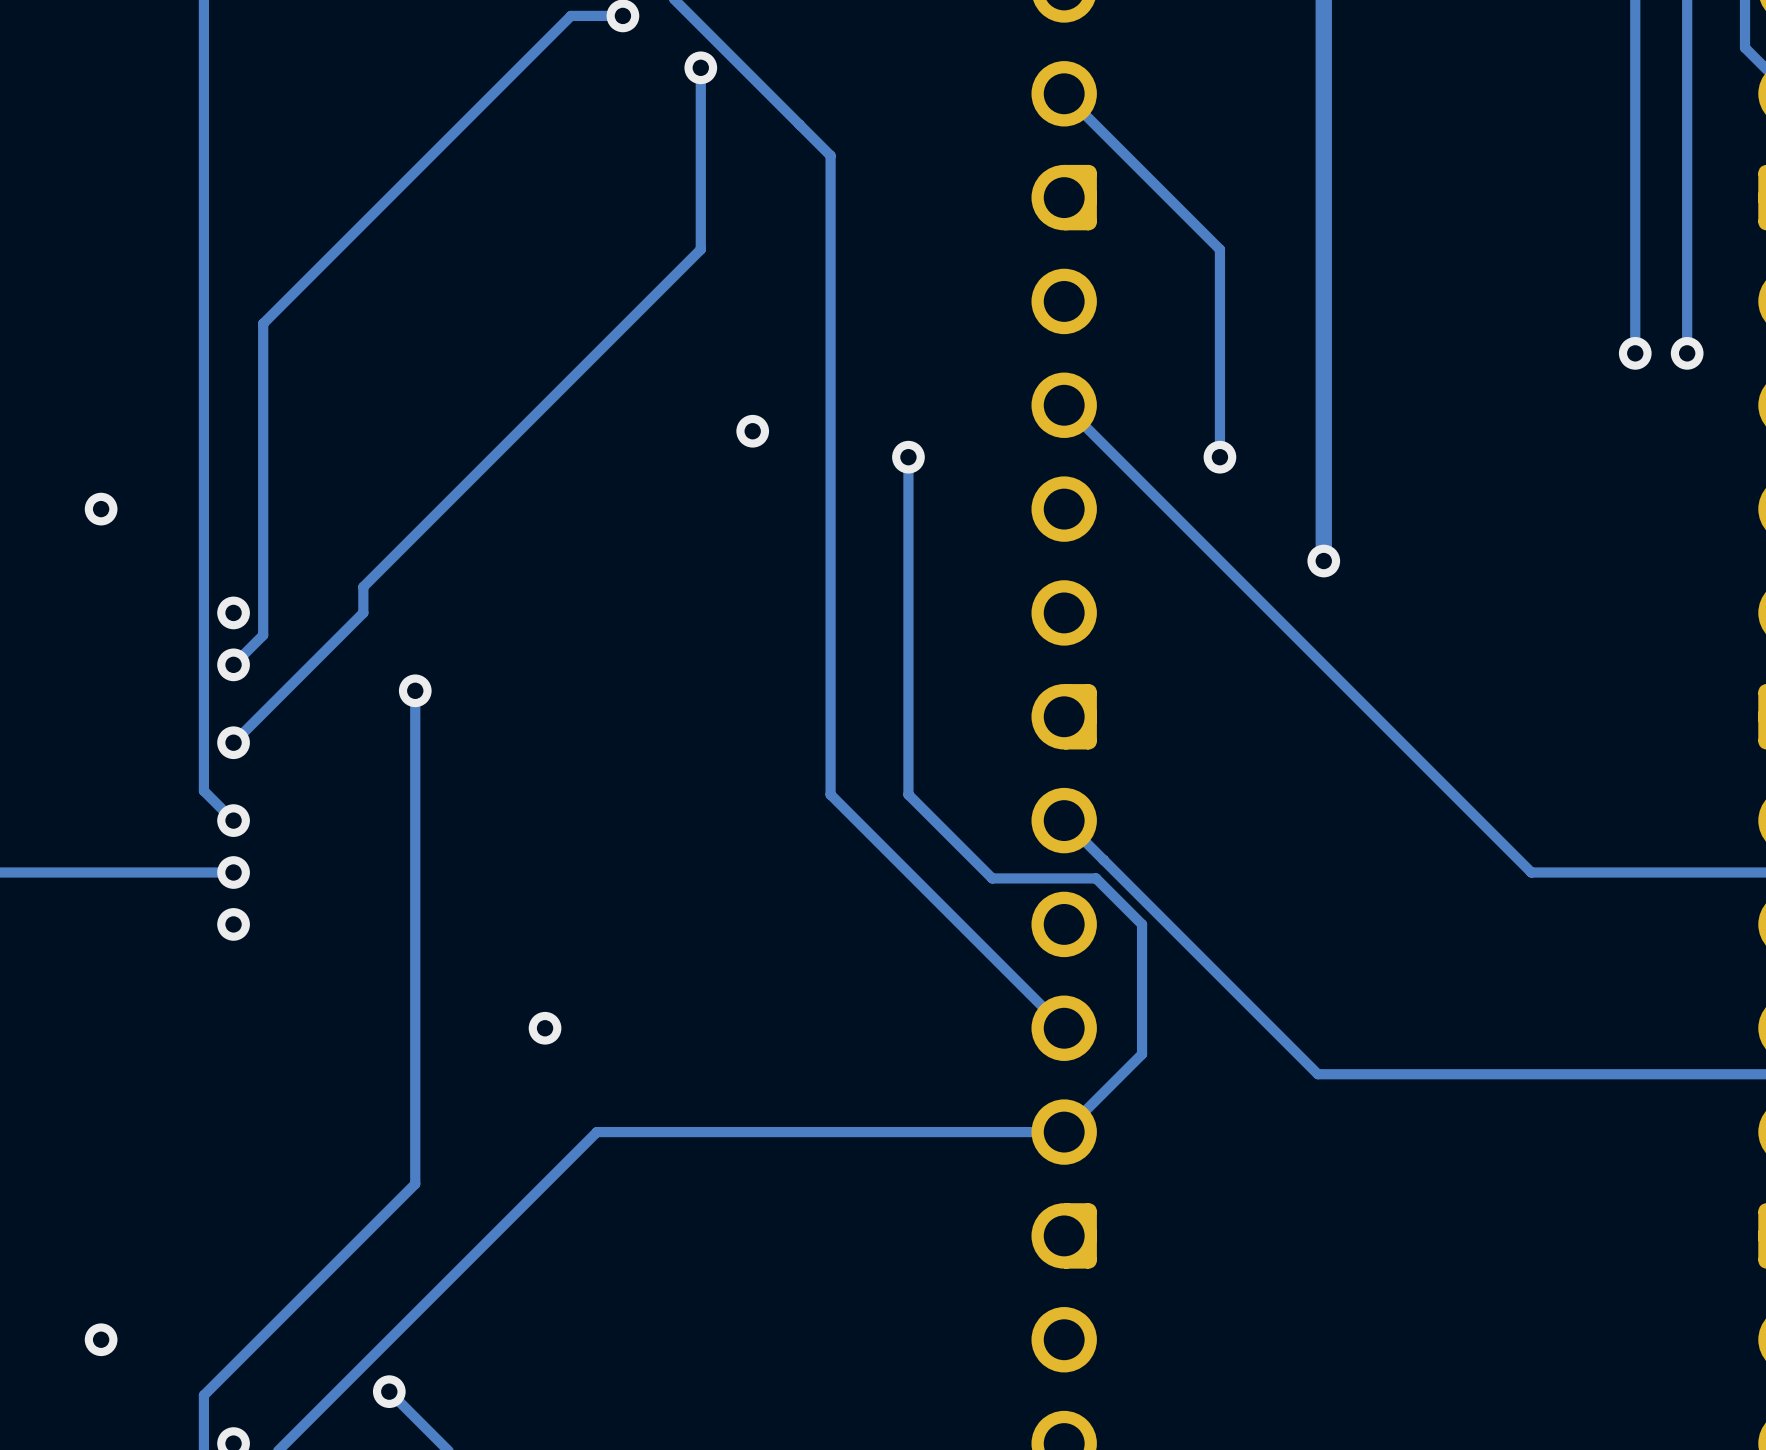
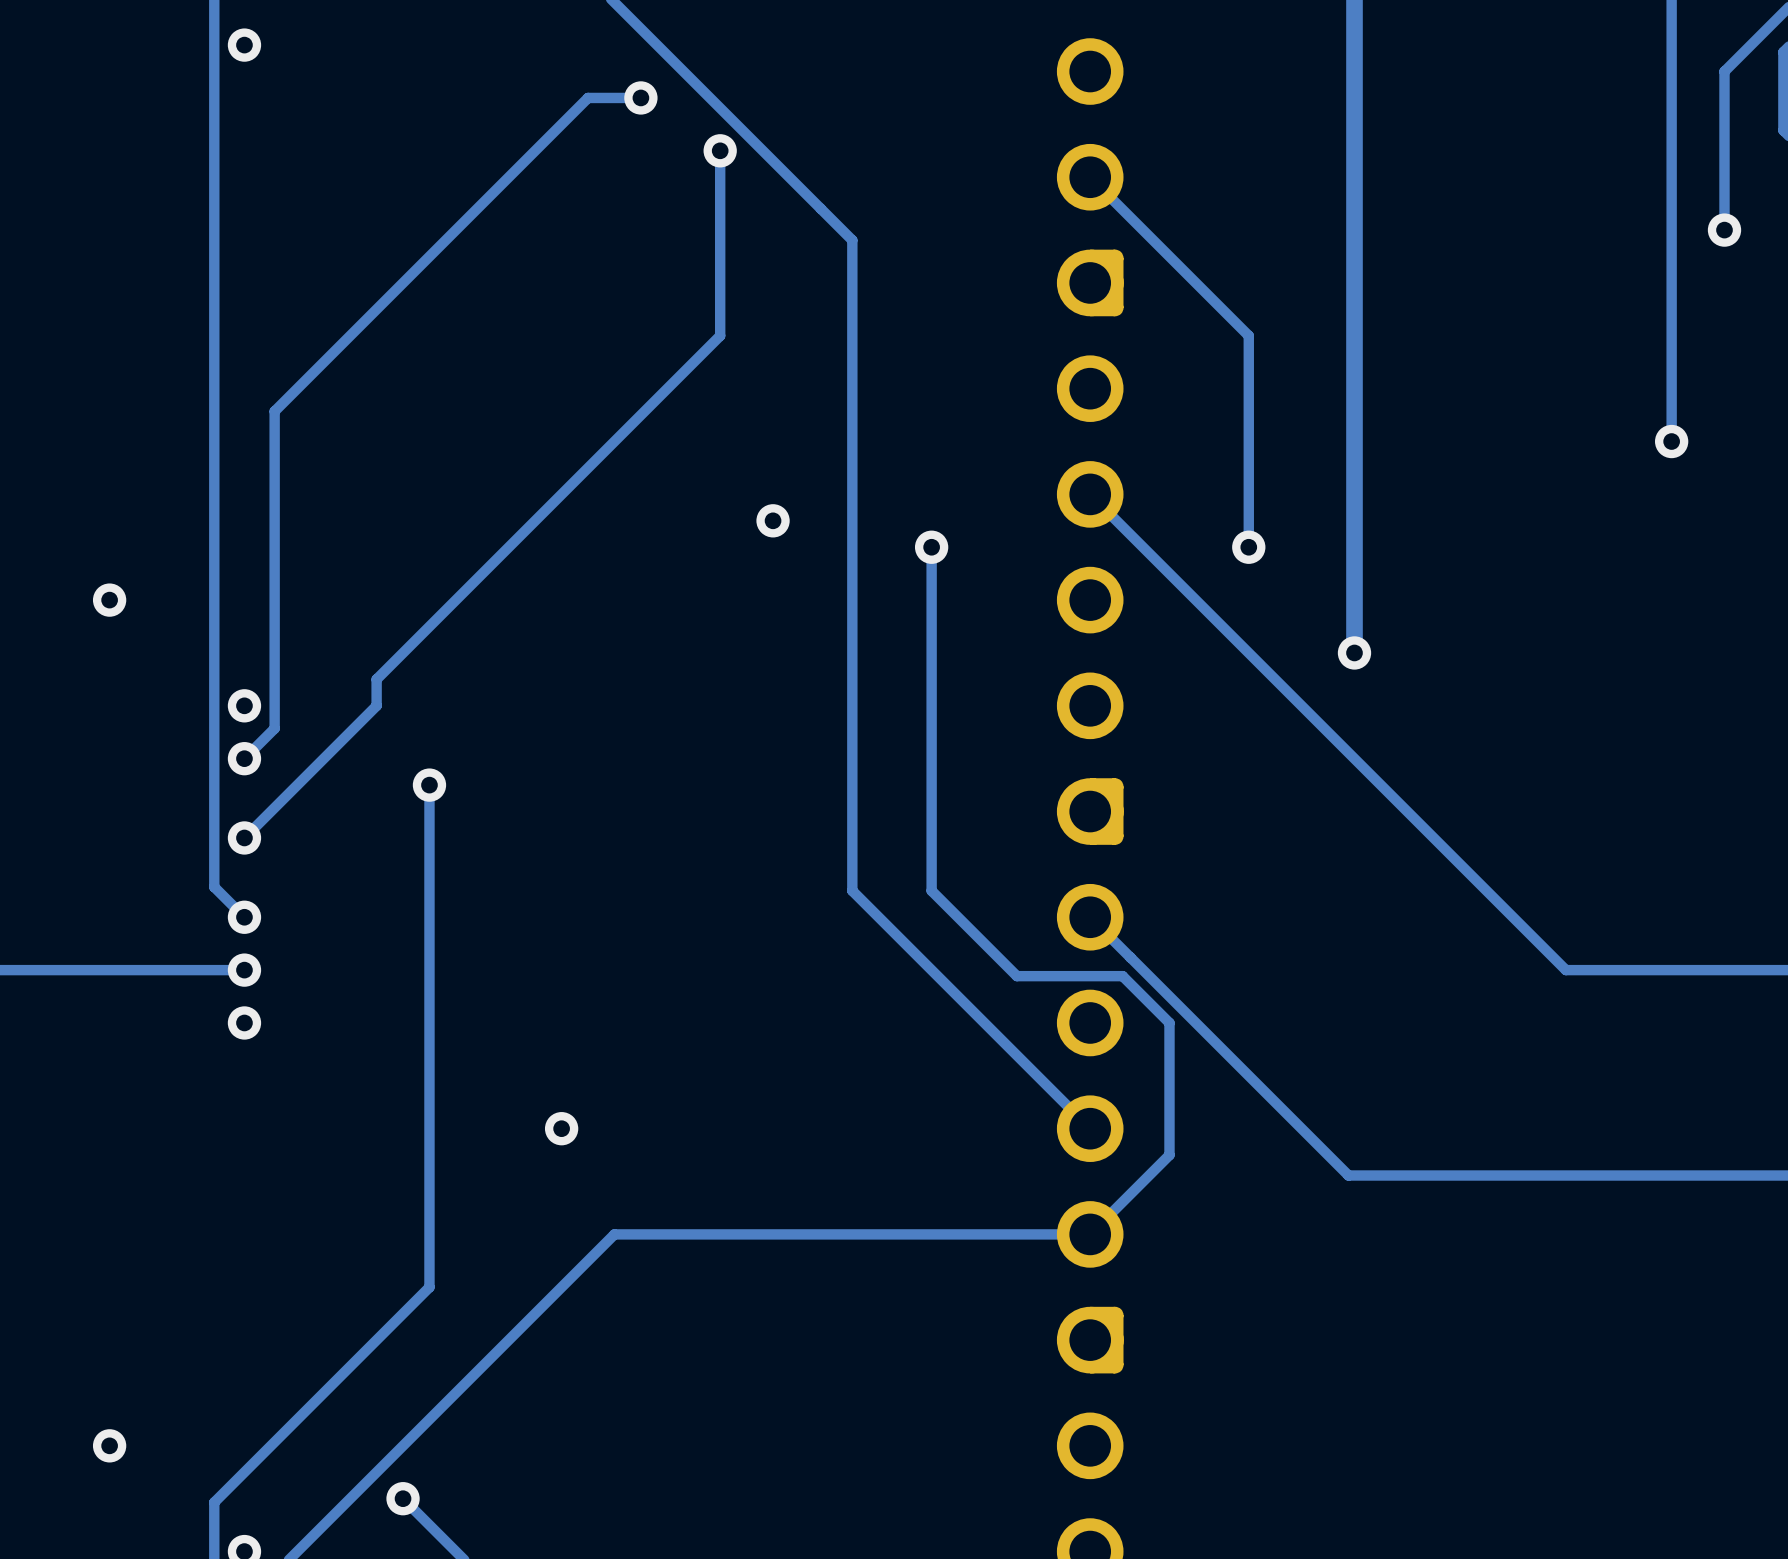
track: (1687, 145) (1687, 353) -> none
via position: (1687, 353) -> (1724, 230)

